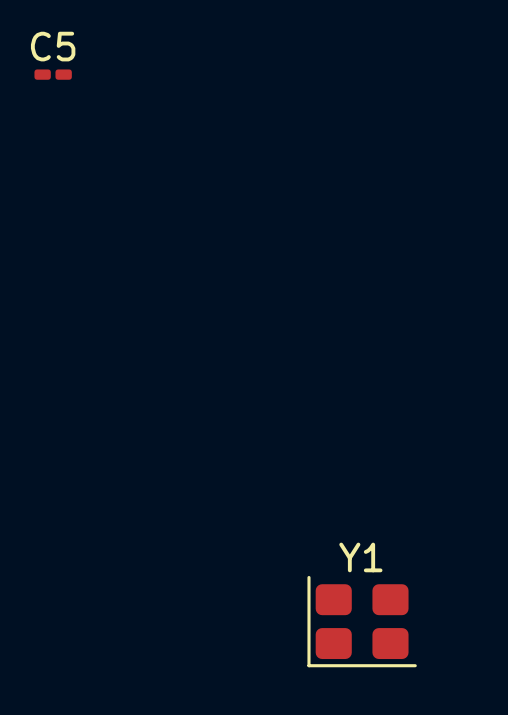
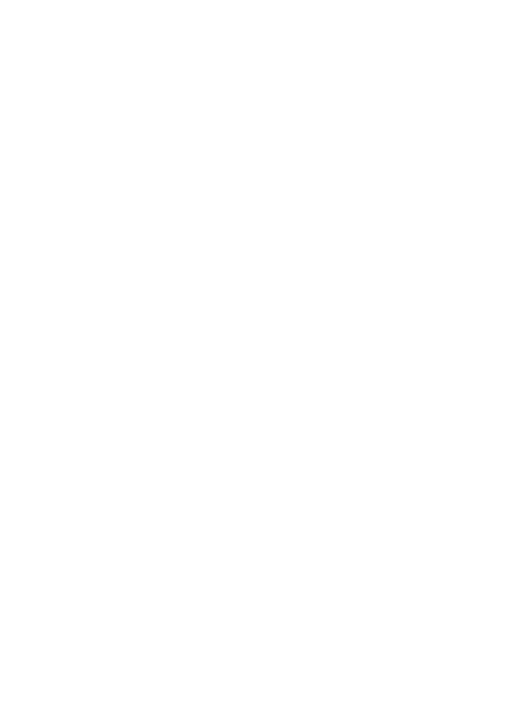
C5: (53, 74) -> none
Y1: (362, 621) -> none

